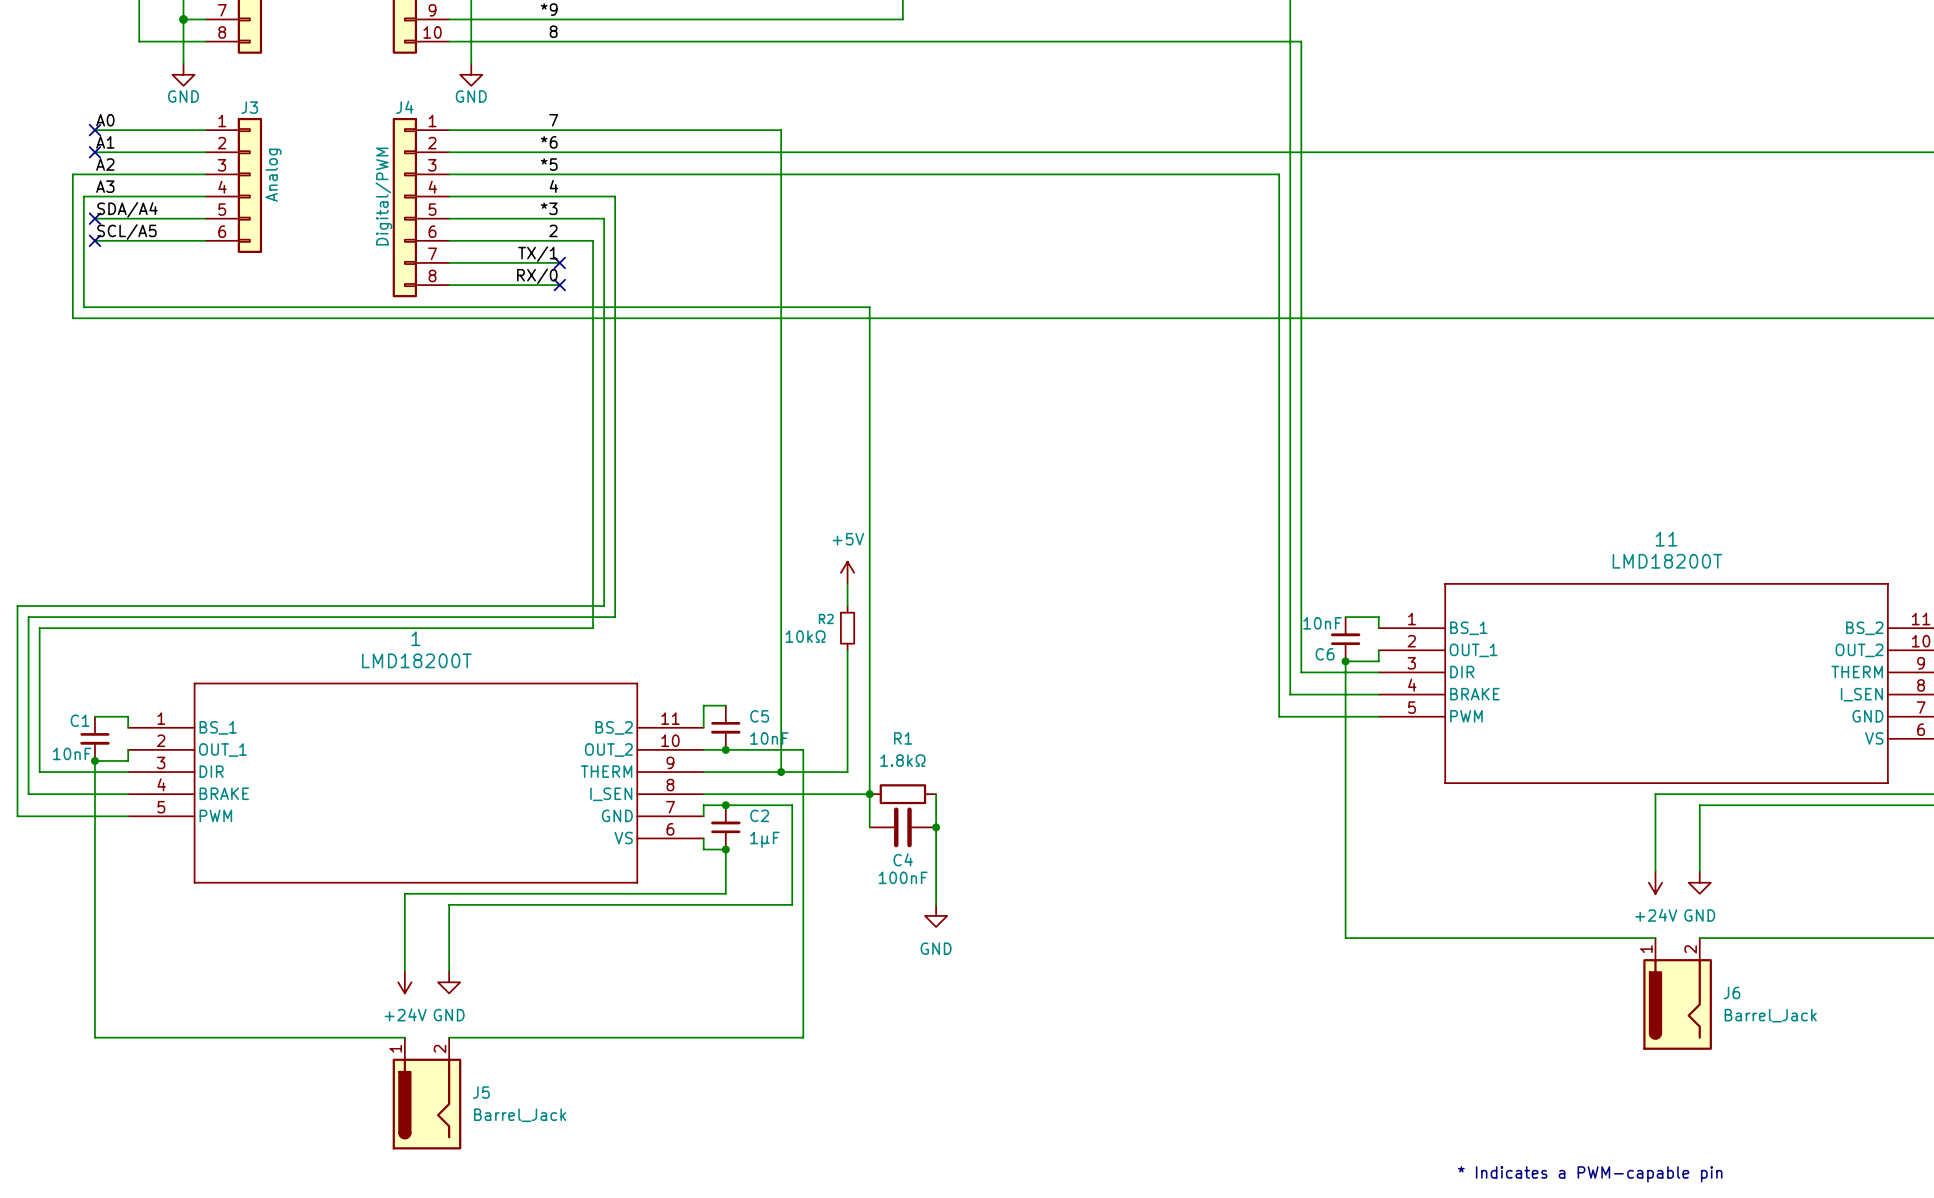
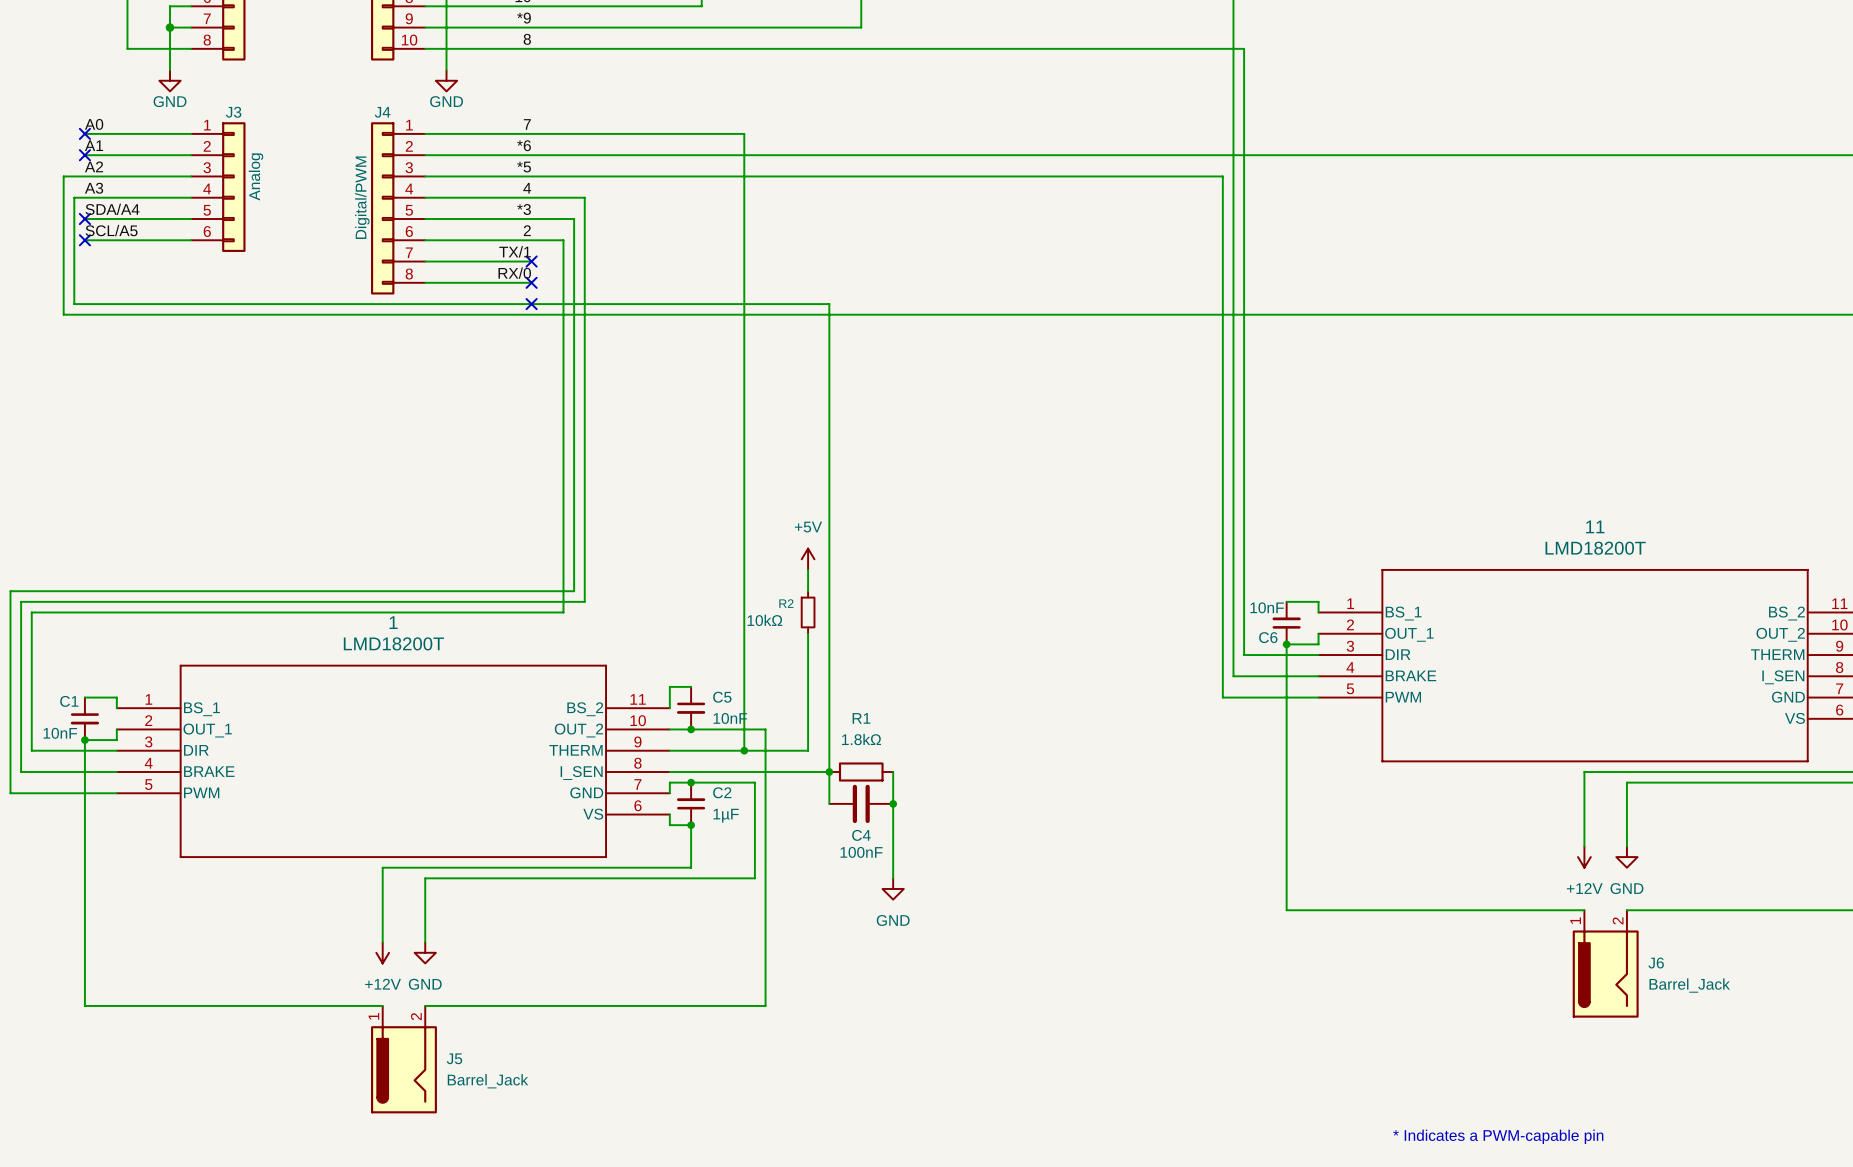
no-connect mark: none -> (531, 304)
power symbol: +24V (1655, 882) -> +12V (1584, 857)
power symbol: +24V (404, 982) -> +12V (382, 952)

